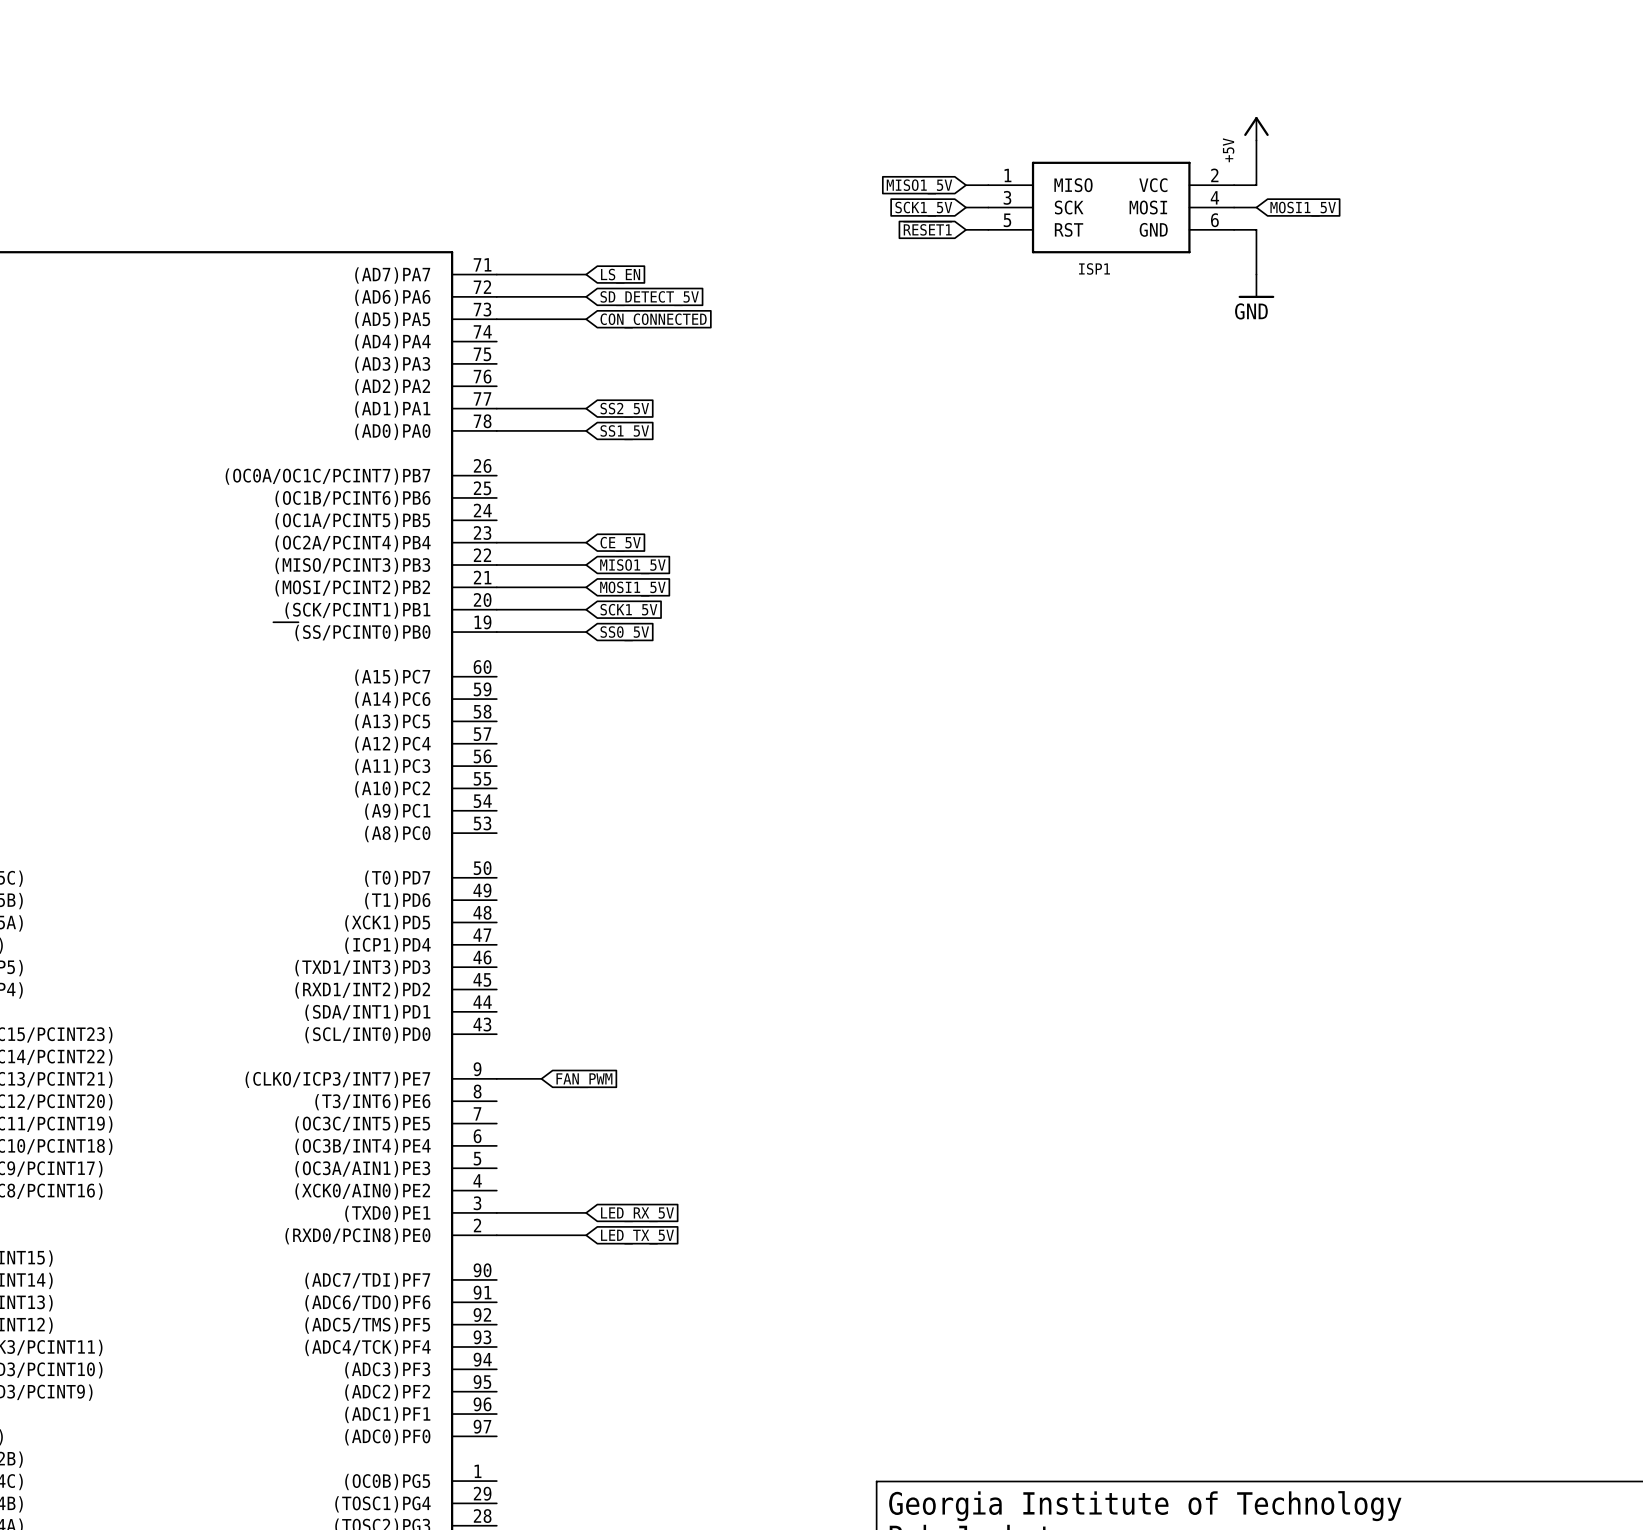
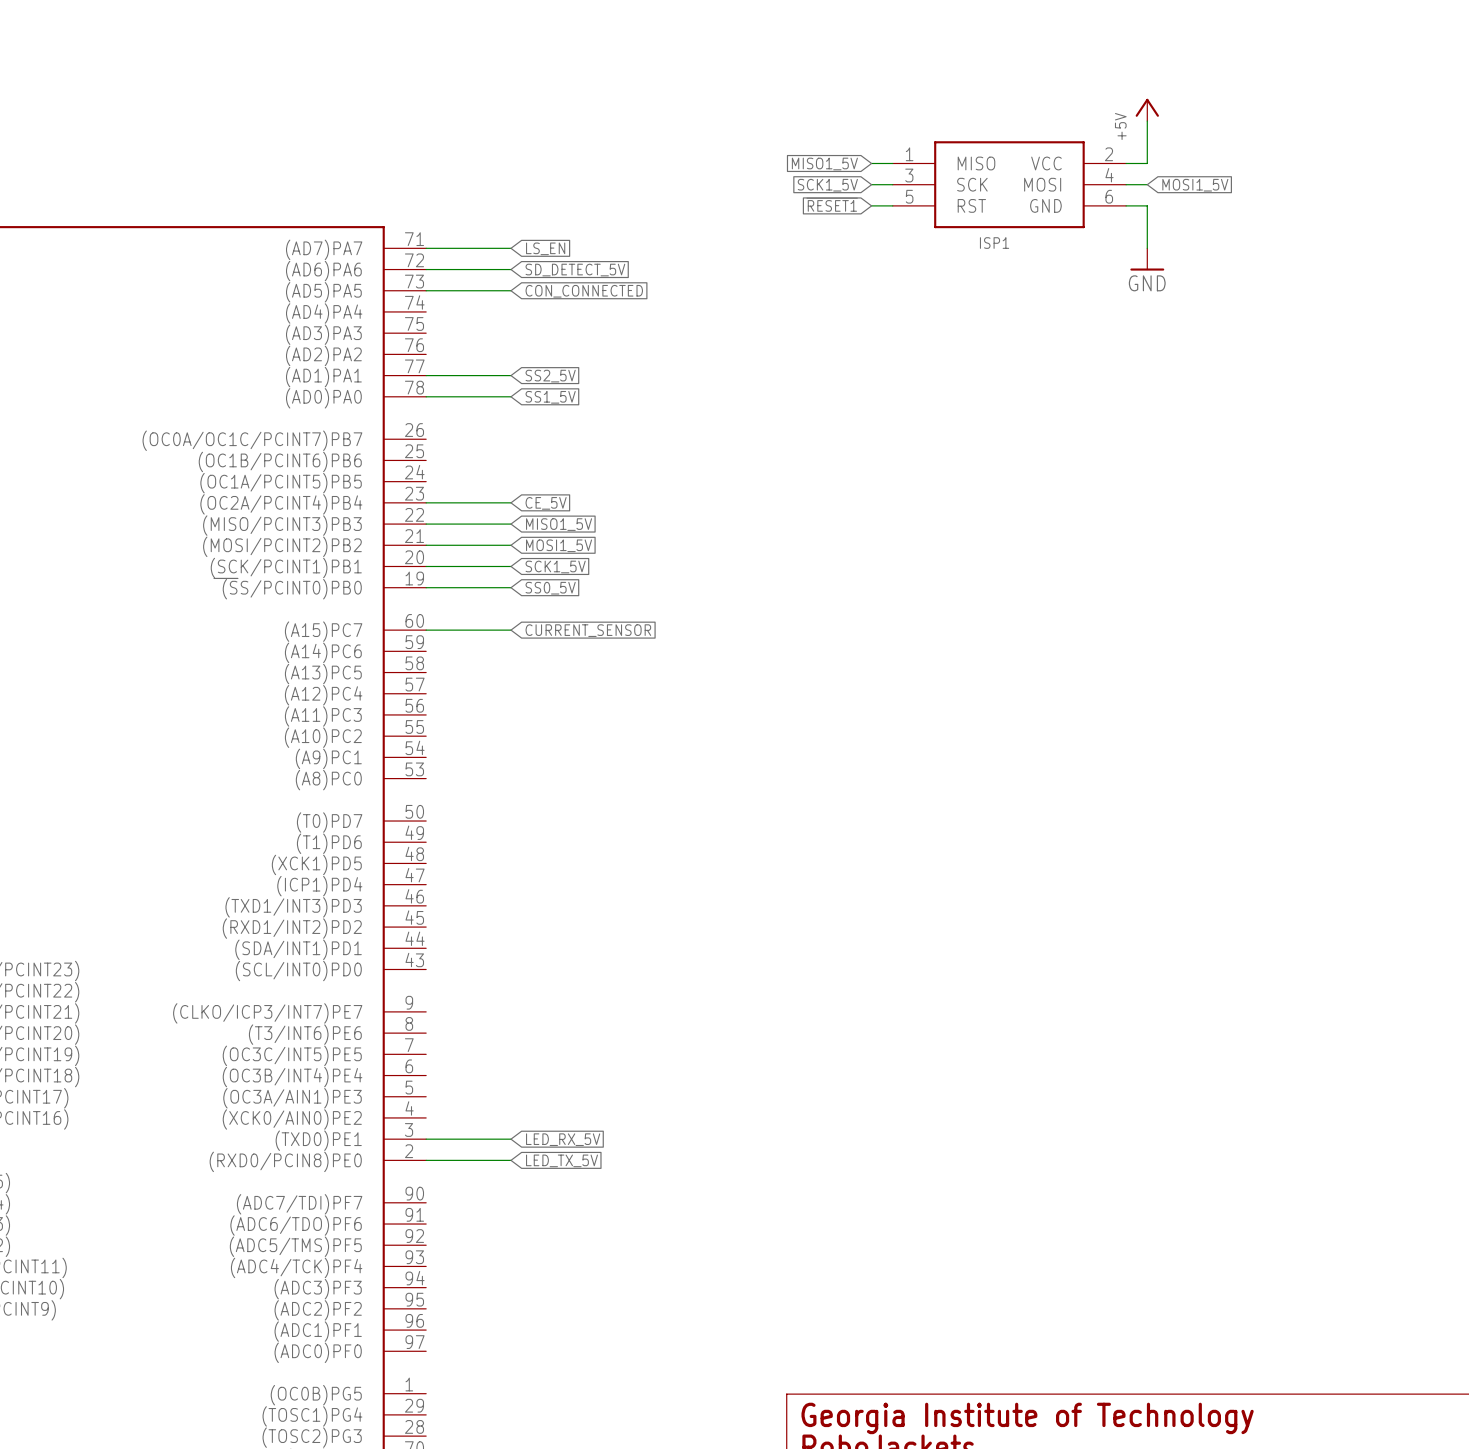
wire: none -> (426, 630) (510, 630)
global label: none -> CURRENT_SENSOR (588, 630)
wire: (496, 1078) (541, 1078) -> none
global label: FAN_PWM (584, 1080) -> none

